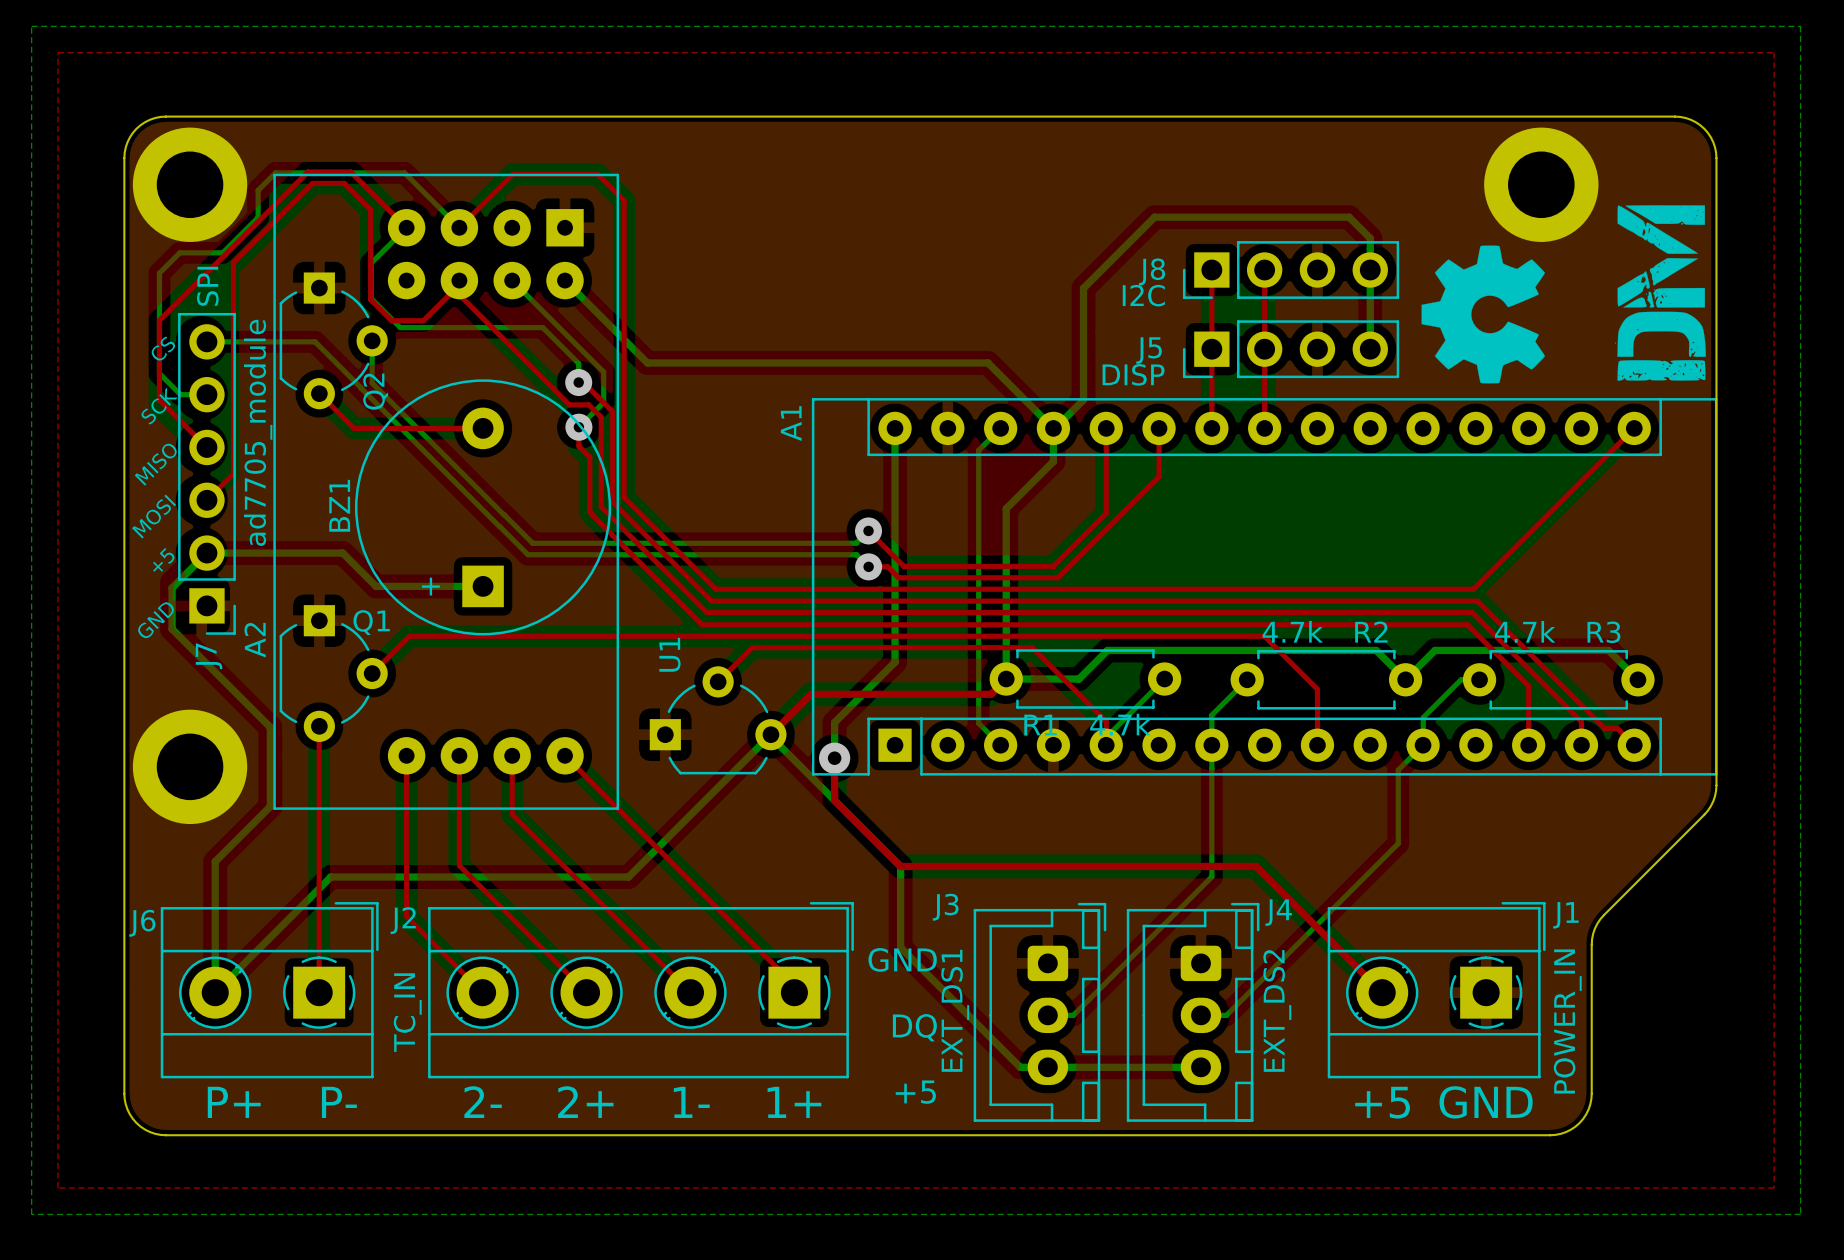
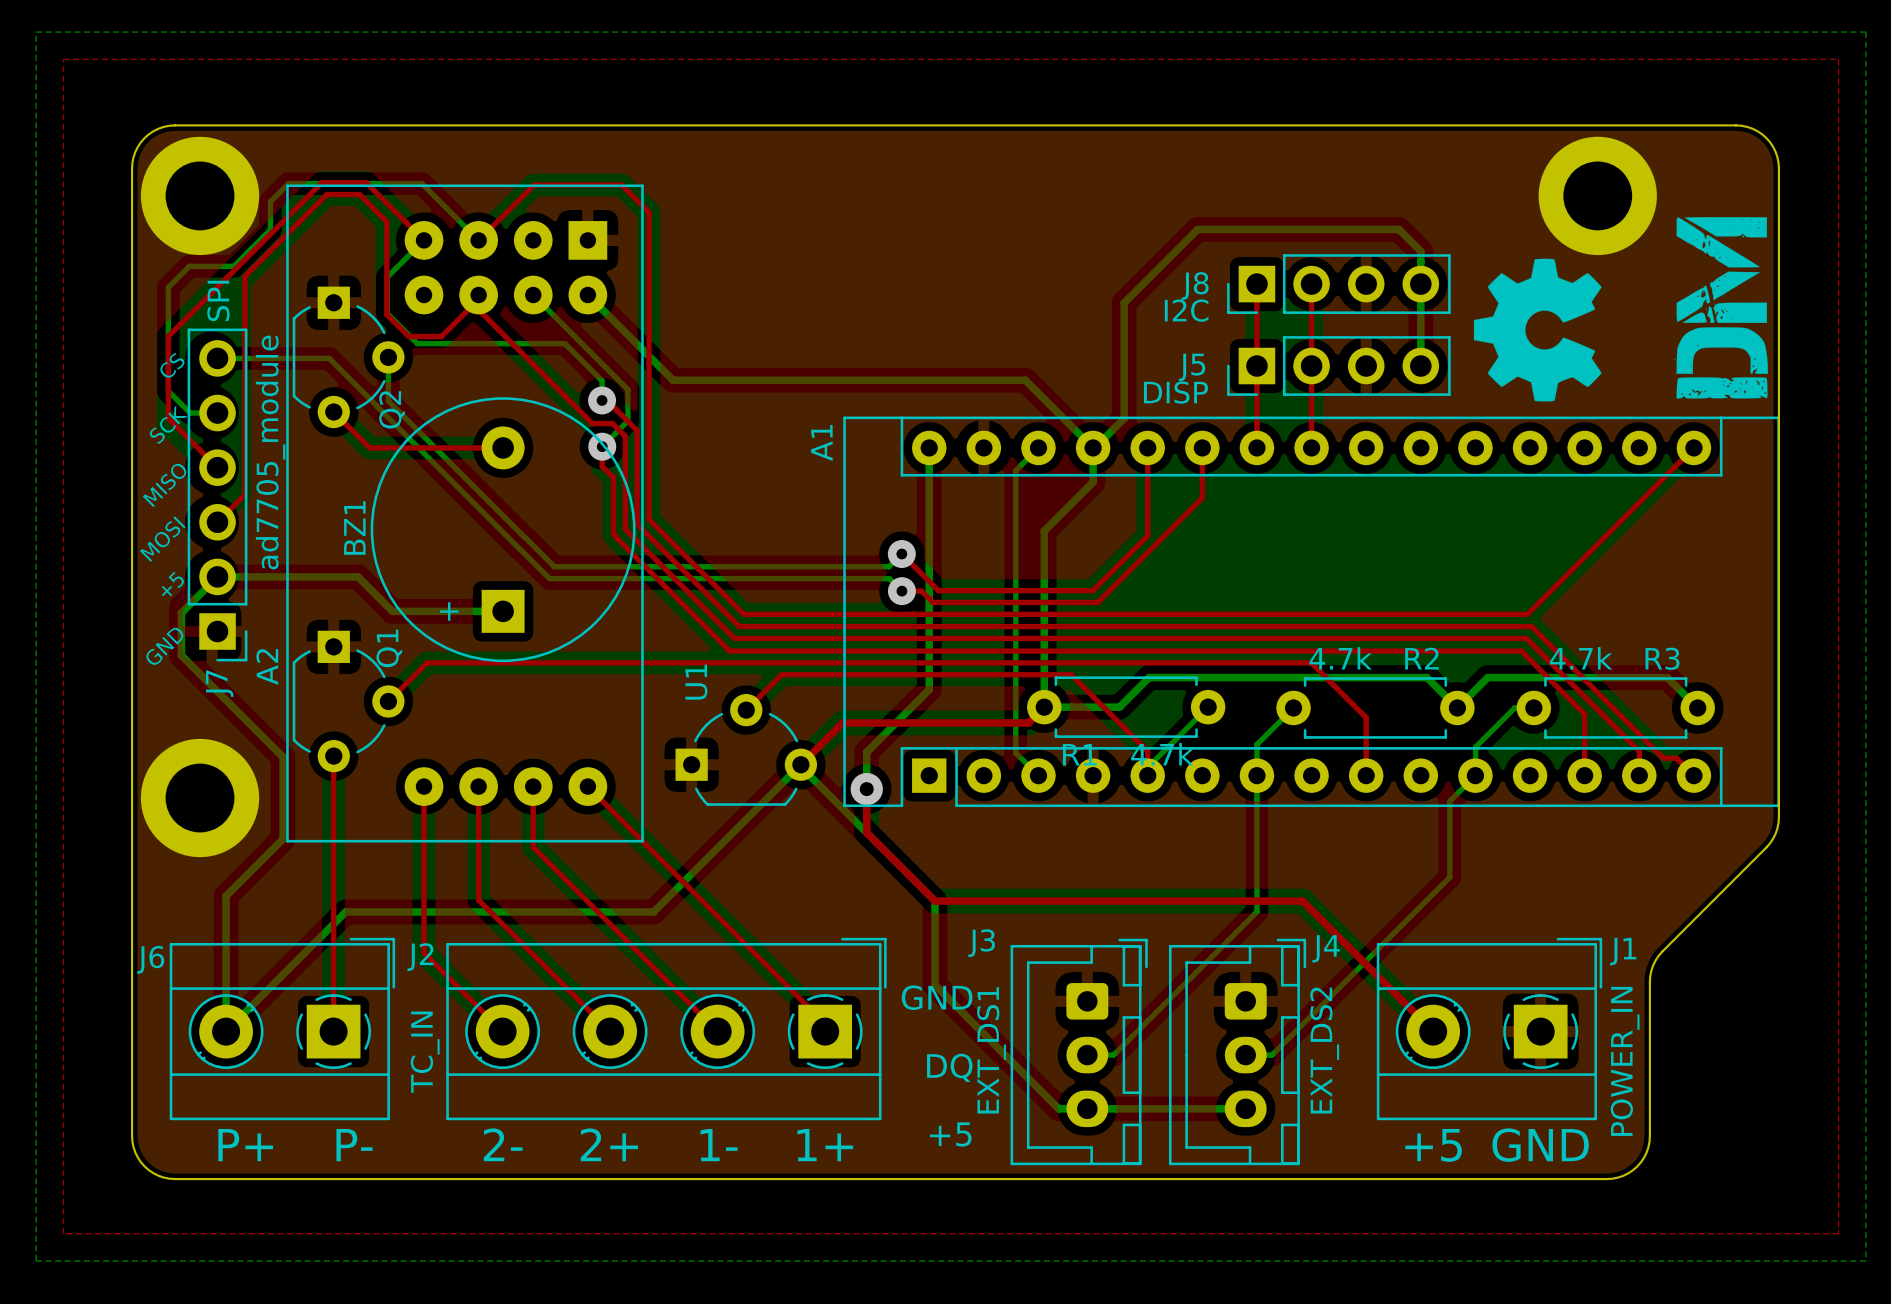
Q1 name rotation: 0° (371, 622) -> 90° counterclockwise (389, 648)

